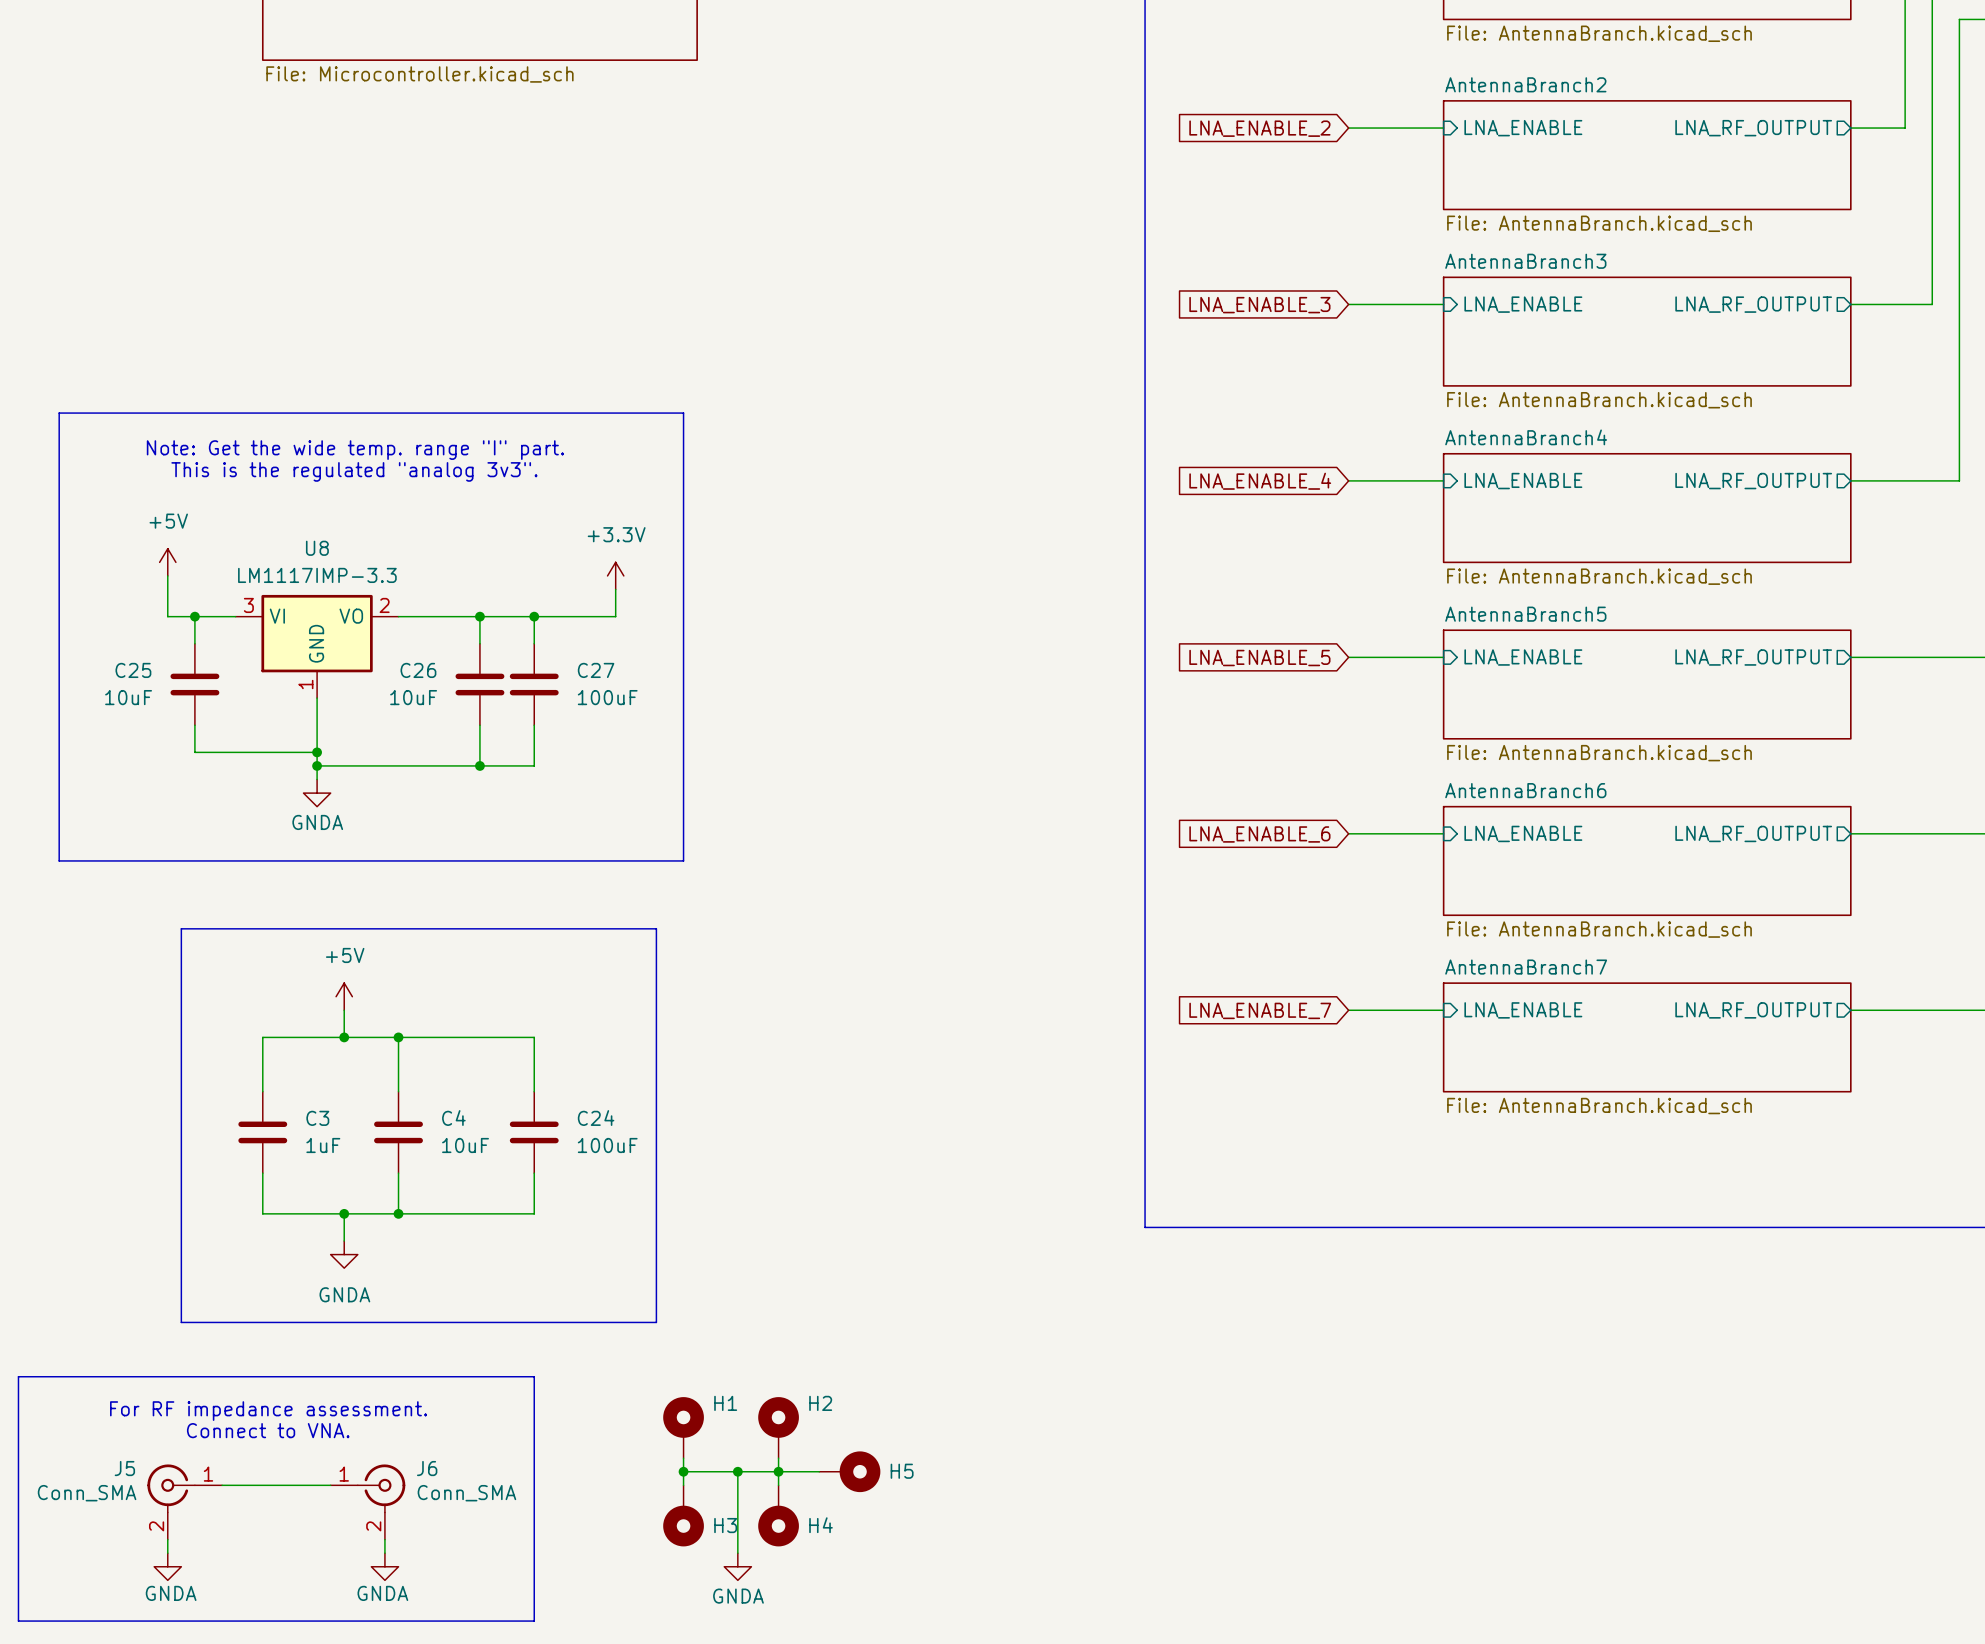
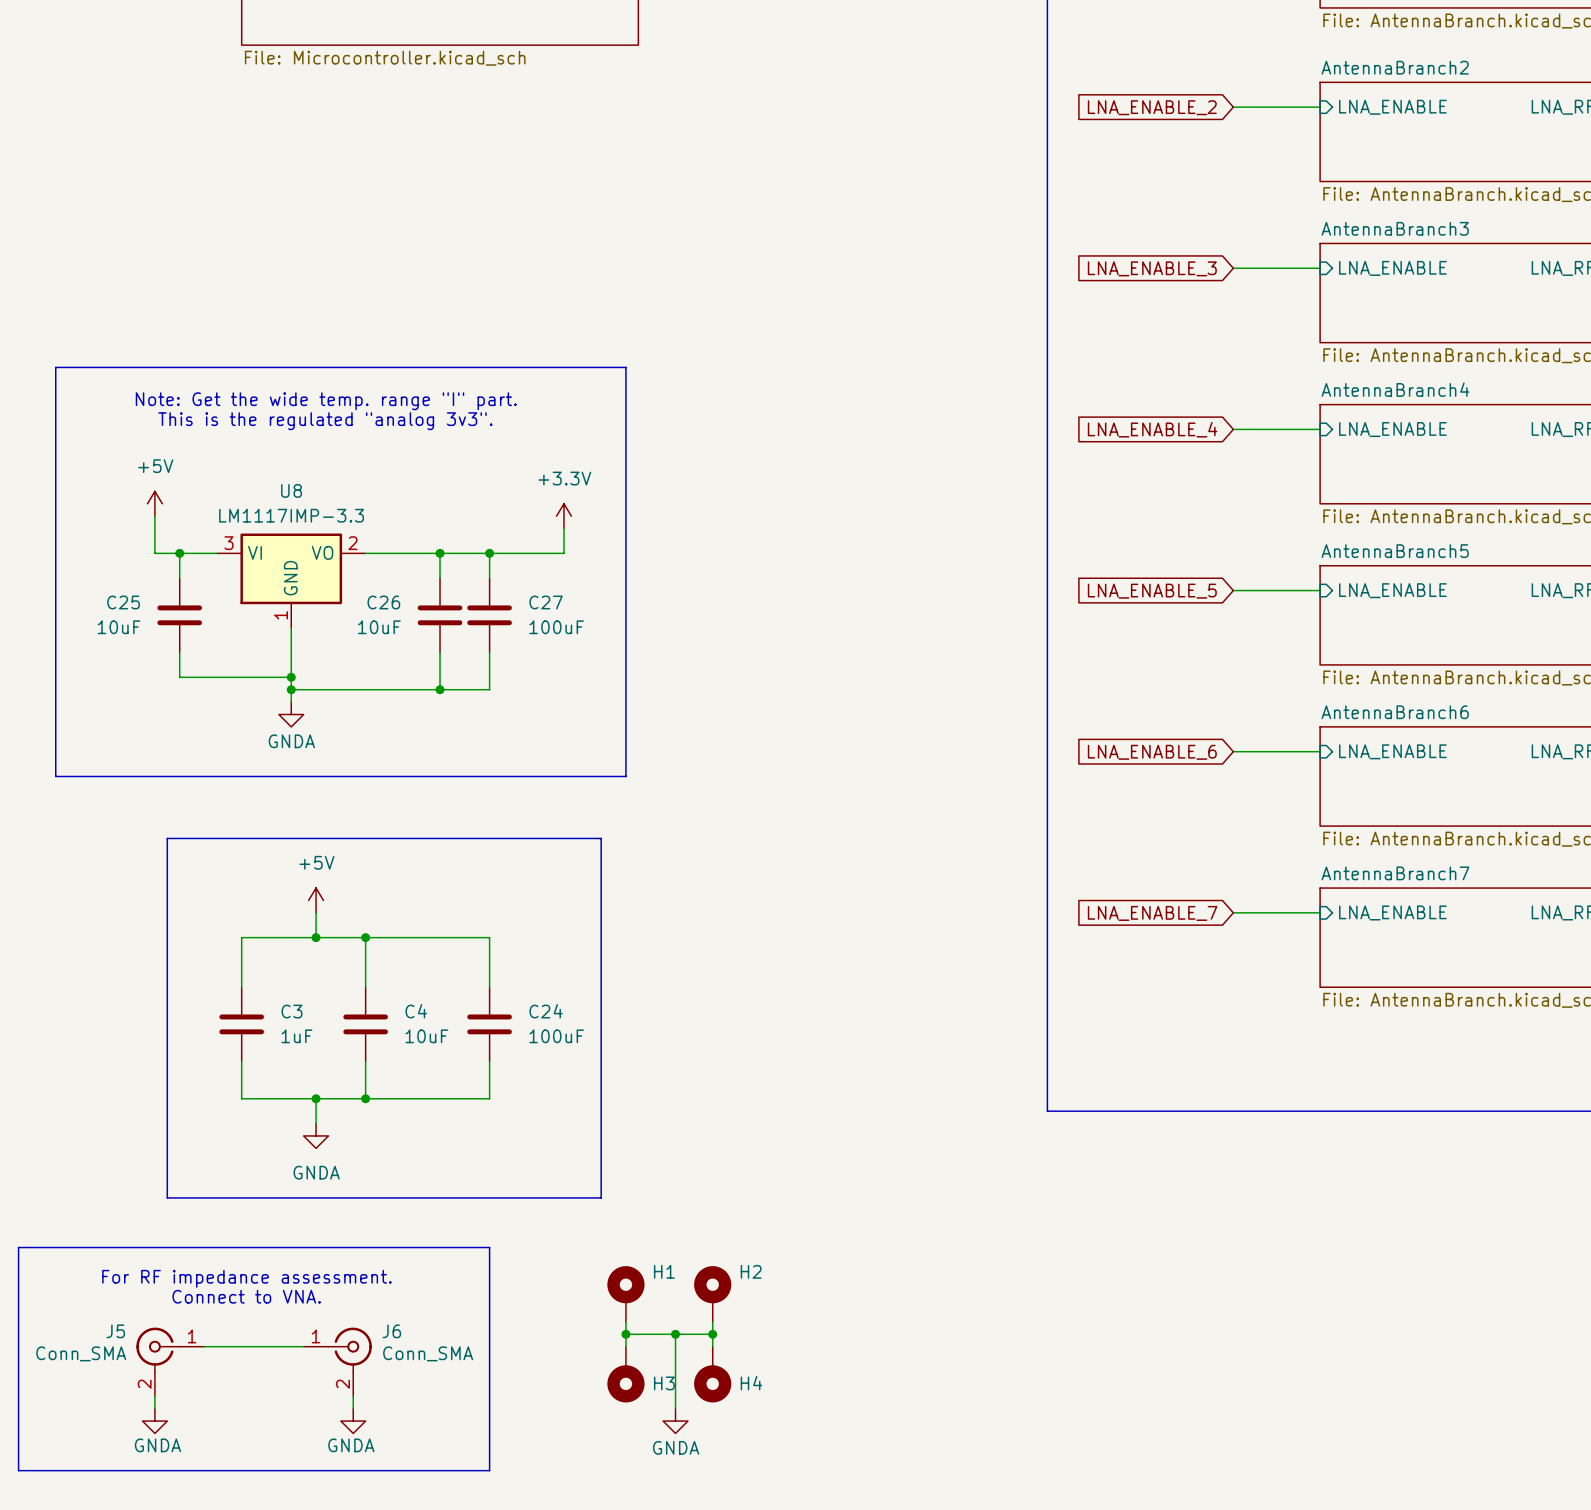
wire: (778, 1471) (819, 1471) -> none
H5: (849, 1471) -> none

